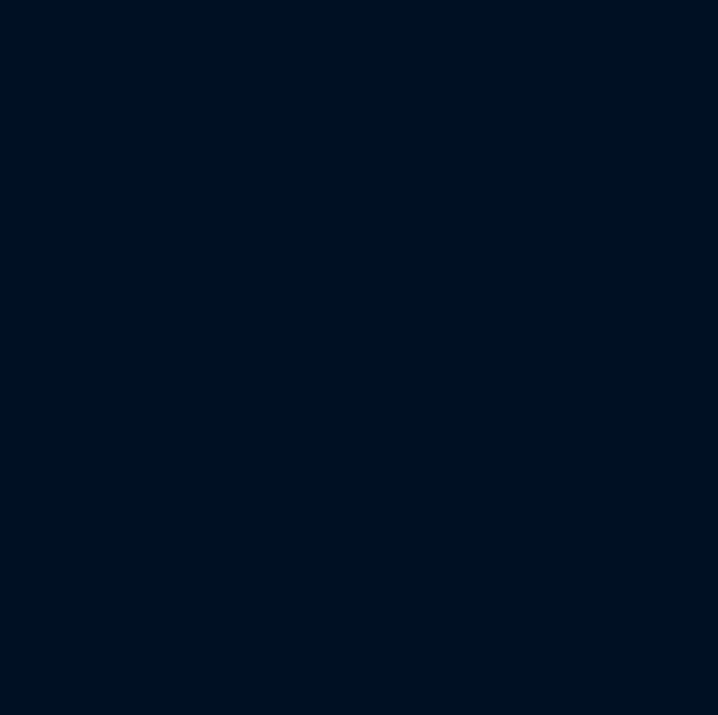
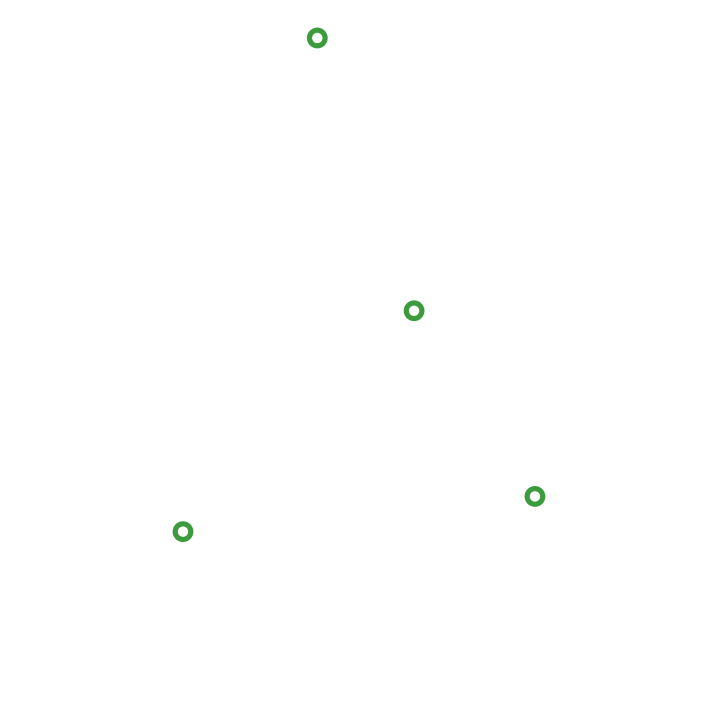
part: none -> (317, 38)
part: none -> (414, 310)
part: none -> (534, 496)
part: none -> (183, 531)

